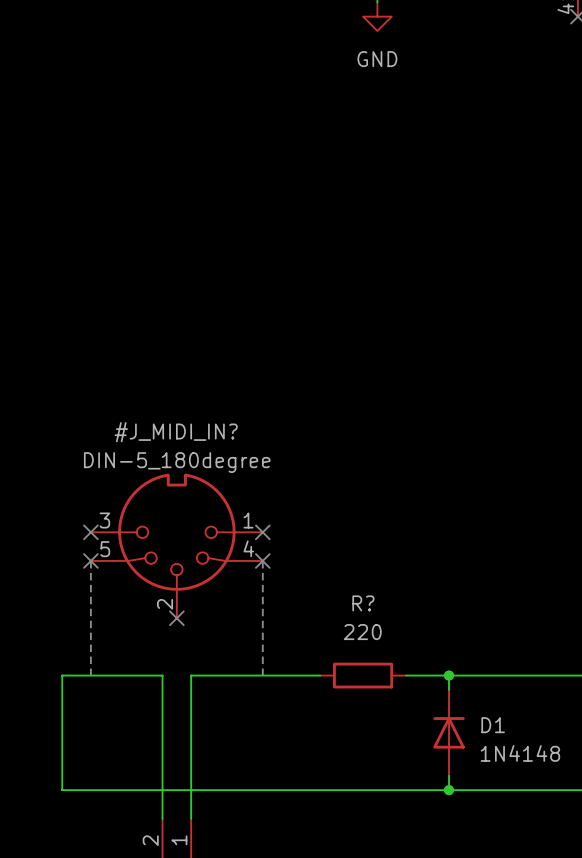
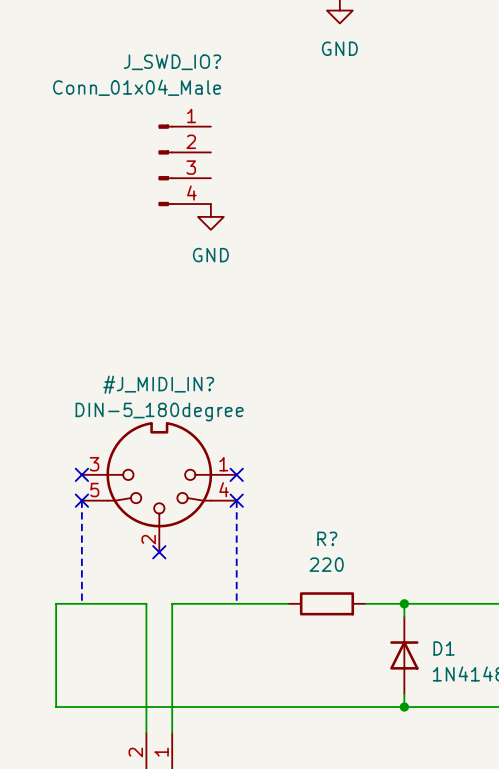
J_SWD_IO?: none -> Conn_01x04_Male (184, 165)
power symbol: none -> GND (210, 216)

